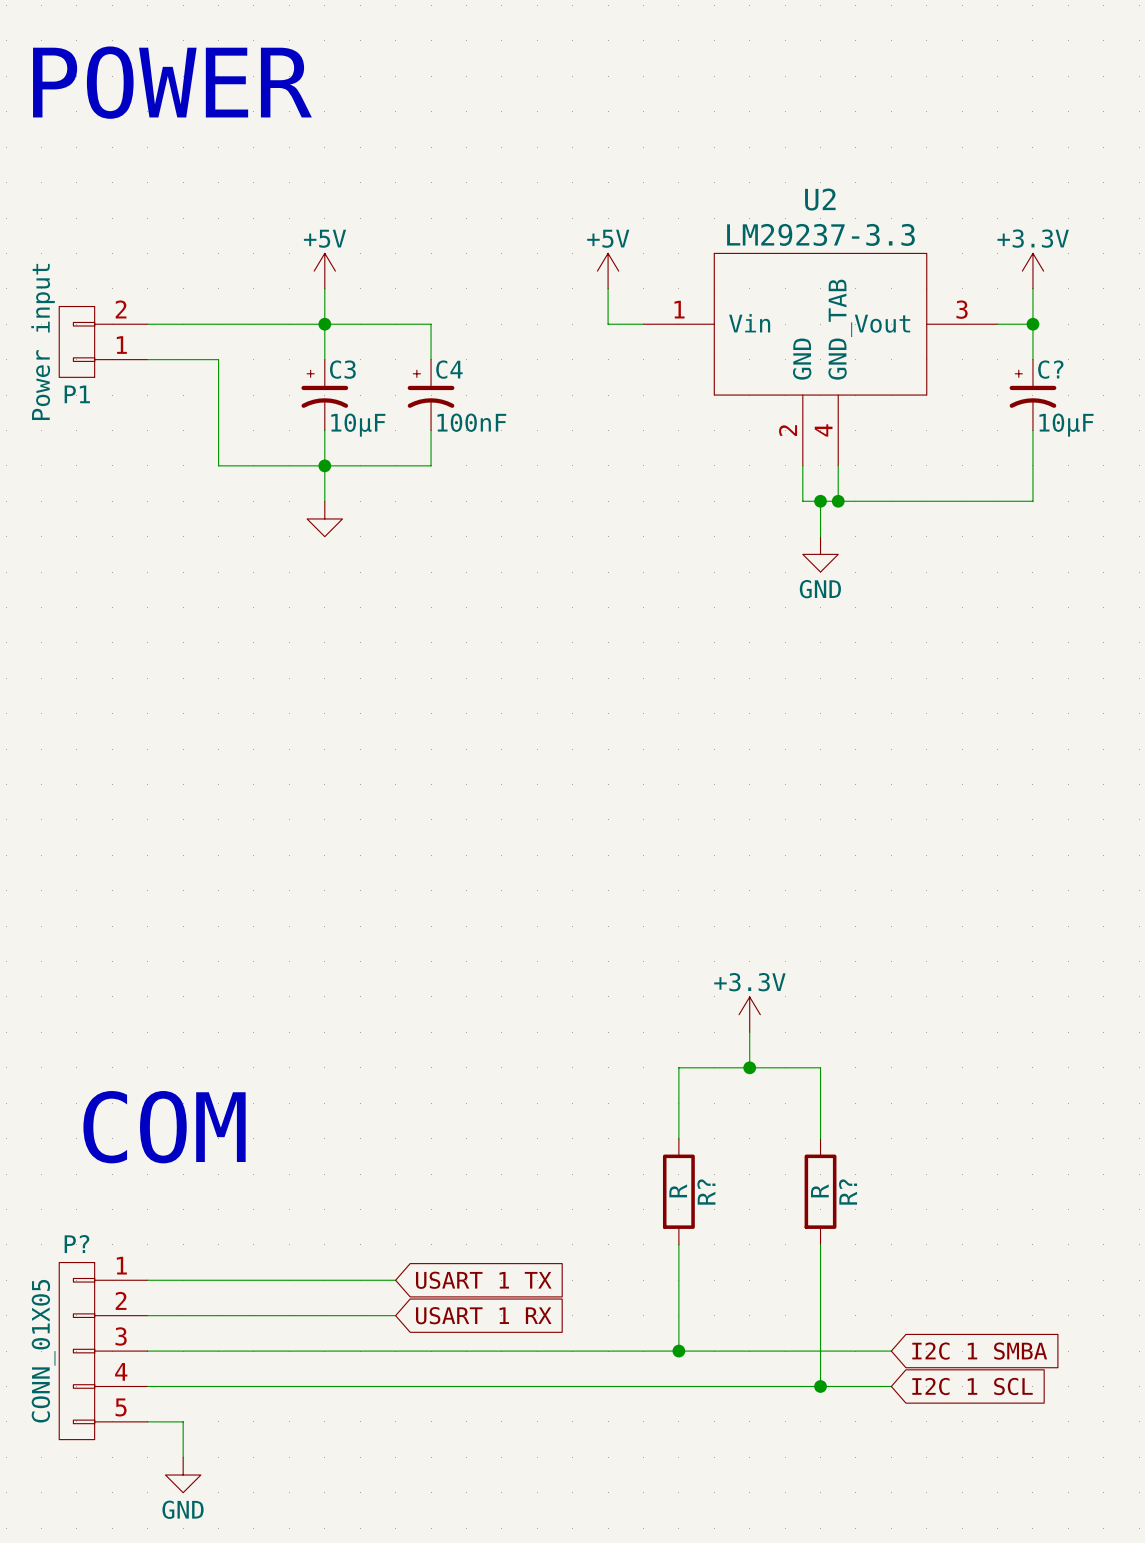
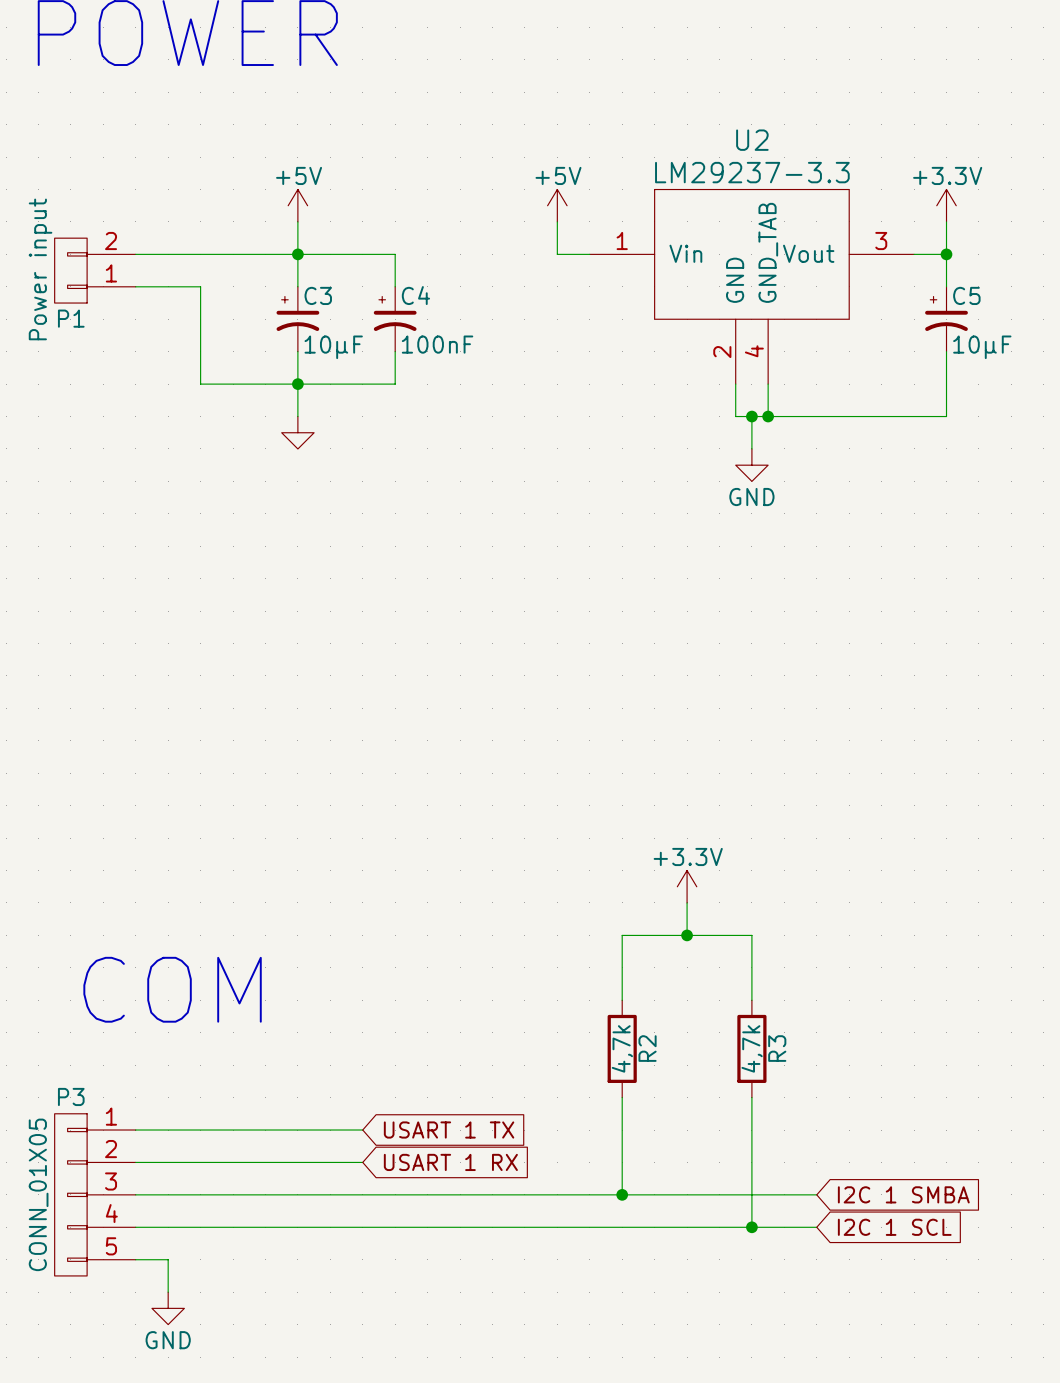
C? name: C? (1050, 369) -> C5 (966, 295)
R? value: R (678, 1190) -> 4,7k (622, 1048)
R? value: R (819, 1190) -> 4,7k (752, 1048)
R? name: R? (706, 1192) -> R2 (647, 1048)
R? name: R? (848, 1192) -> R3 (777, 1048)
P? name: P? (76, 1244) -> P3 (71, 1096)

